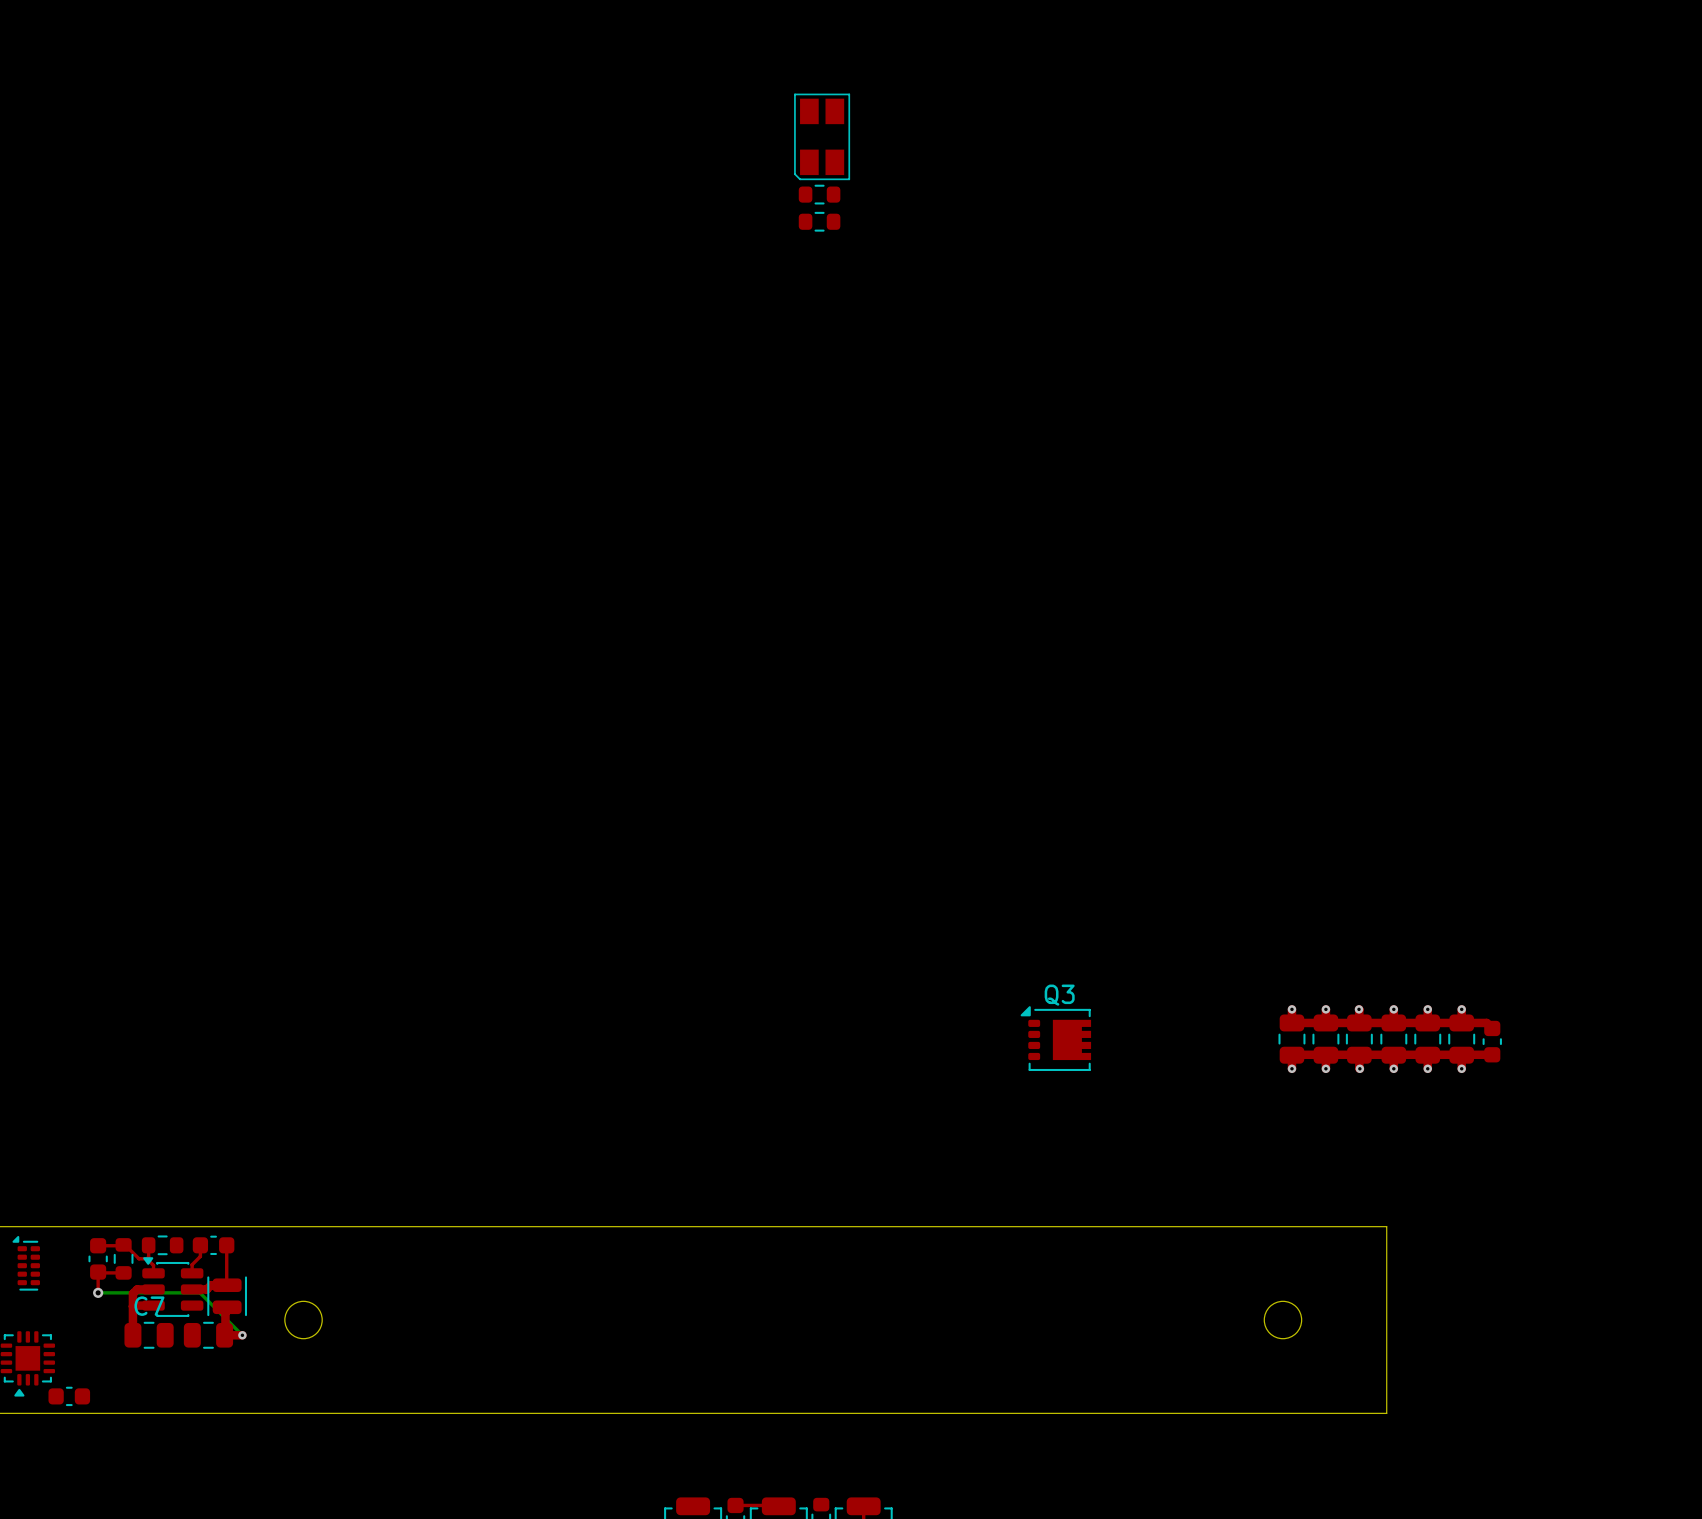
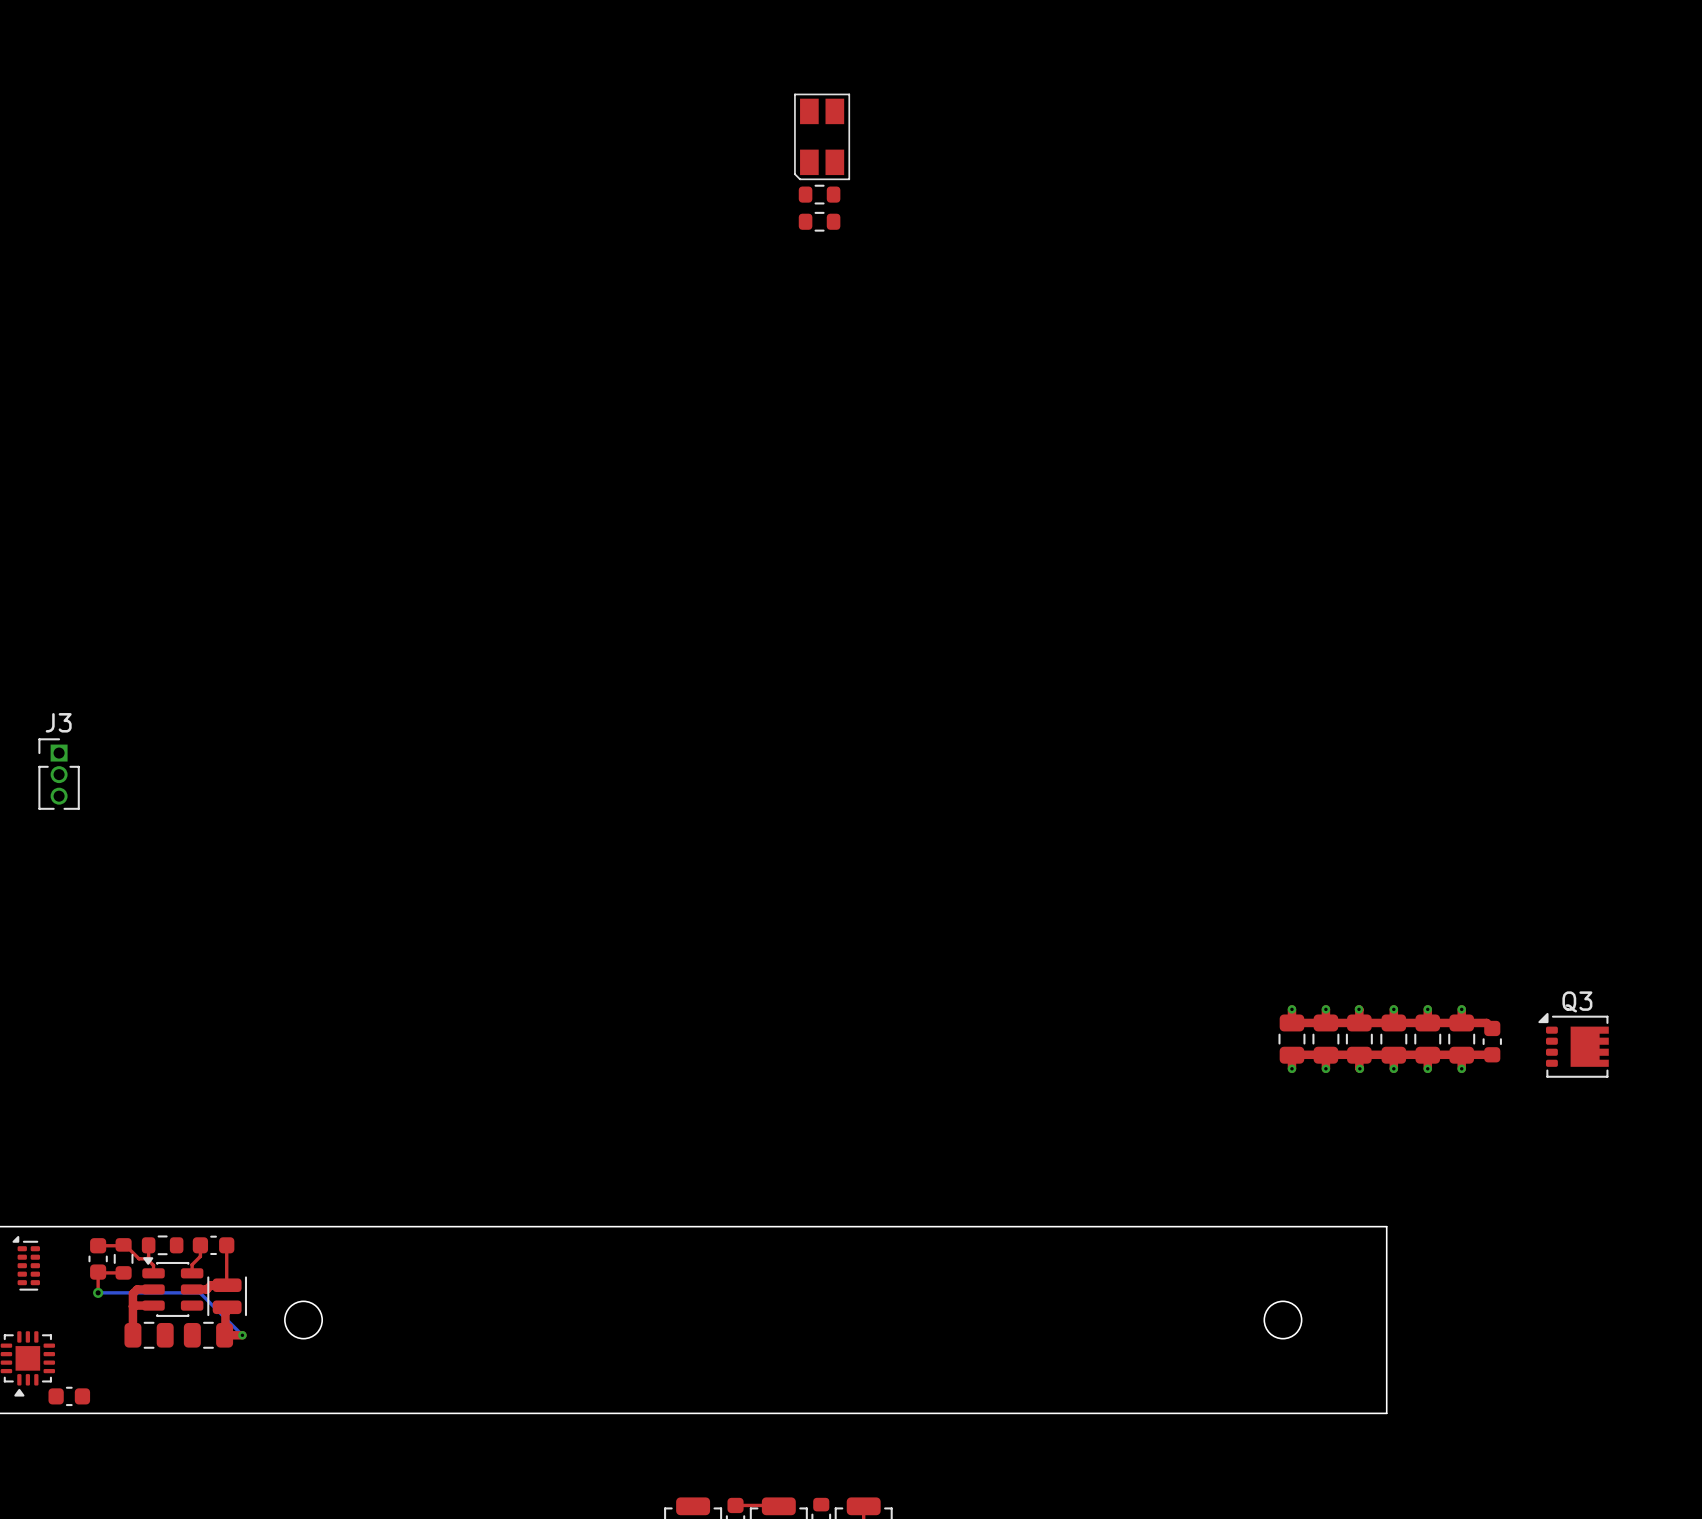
J3: none -> (59, 774)
Q3 position: (1055, 1038) -> (1573, 1045)
C7 name: C7 (149, 1306) -> none

